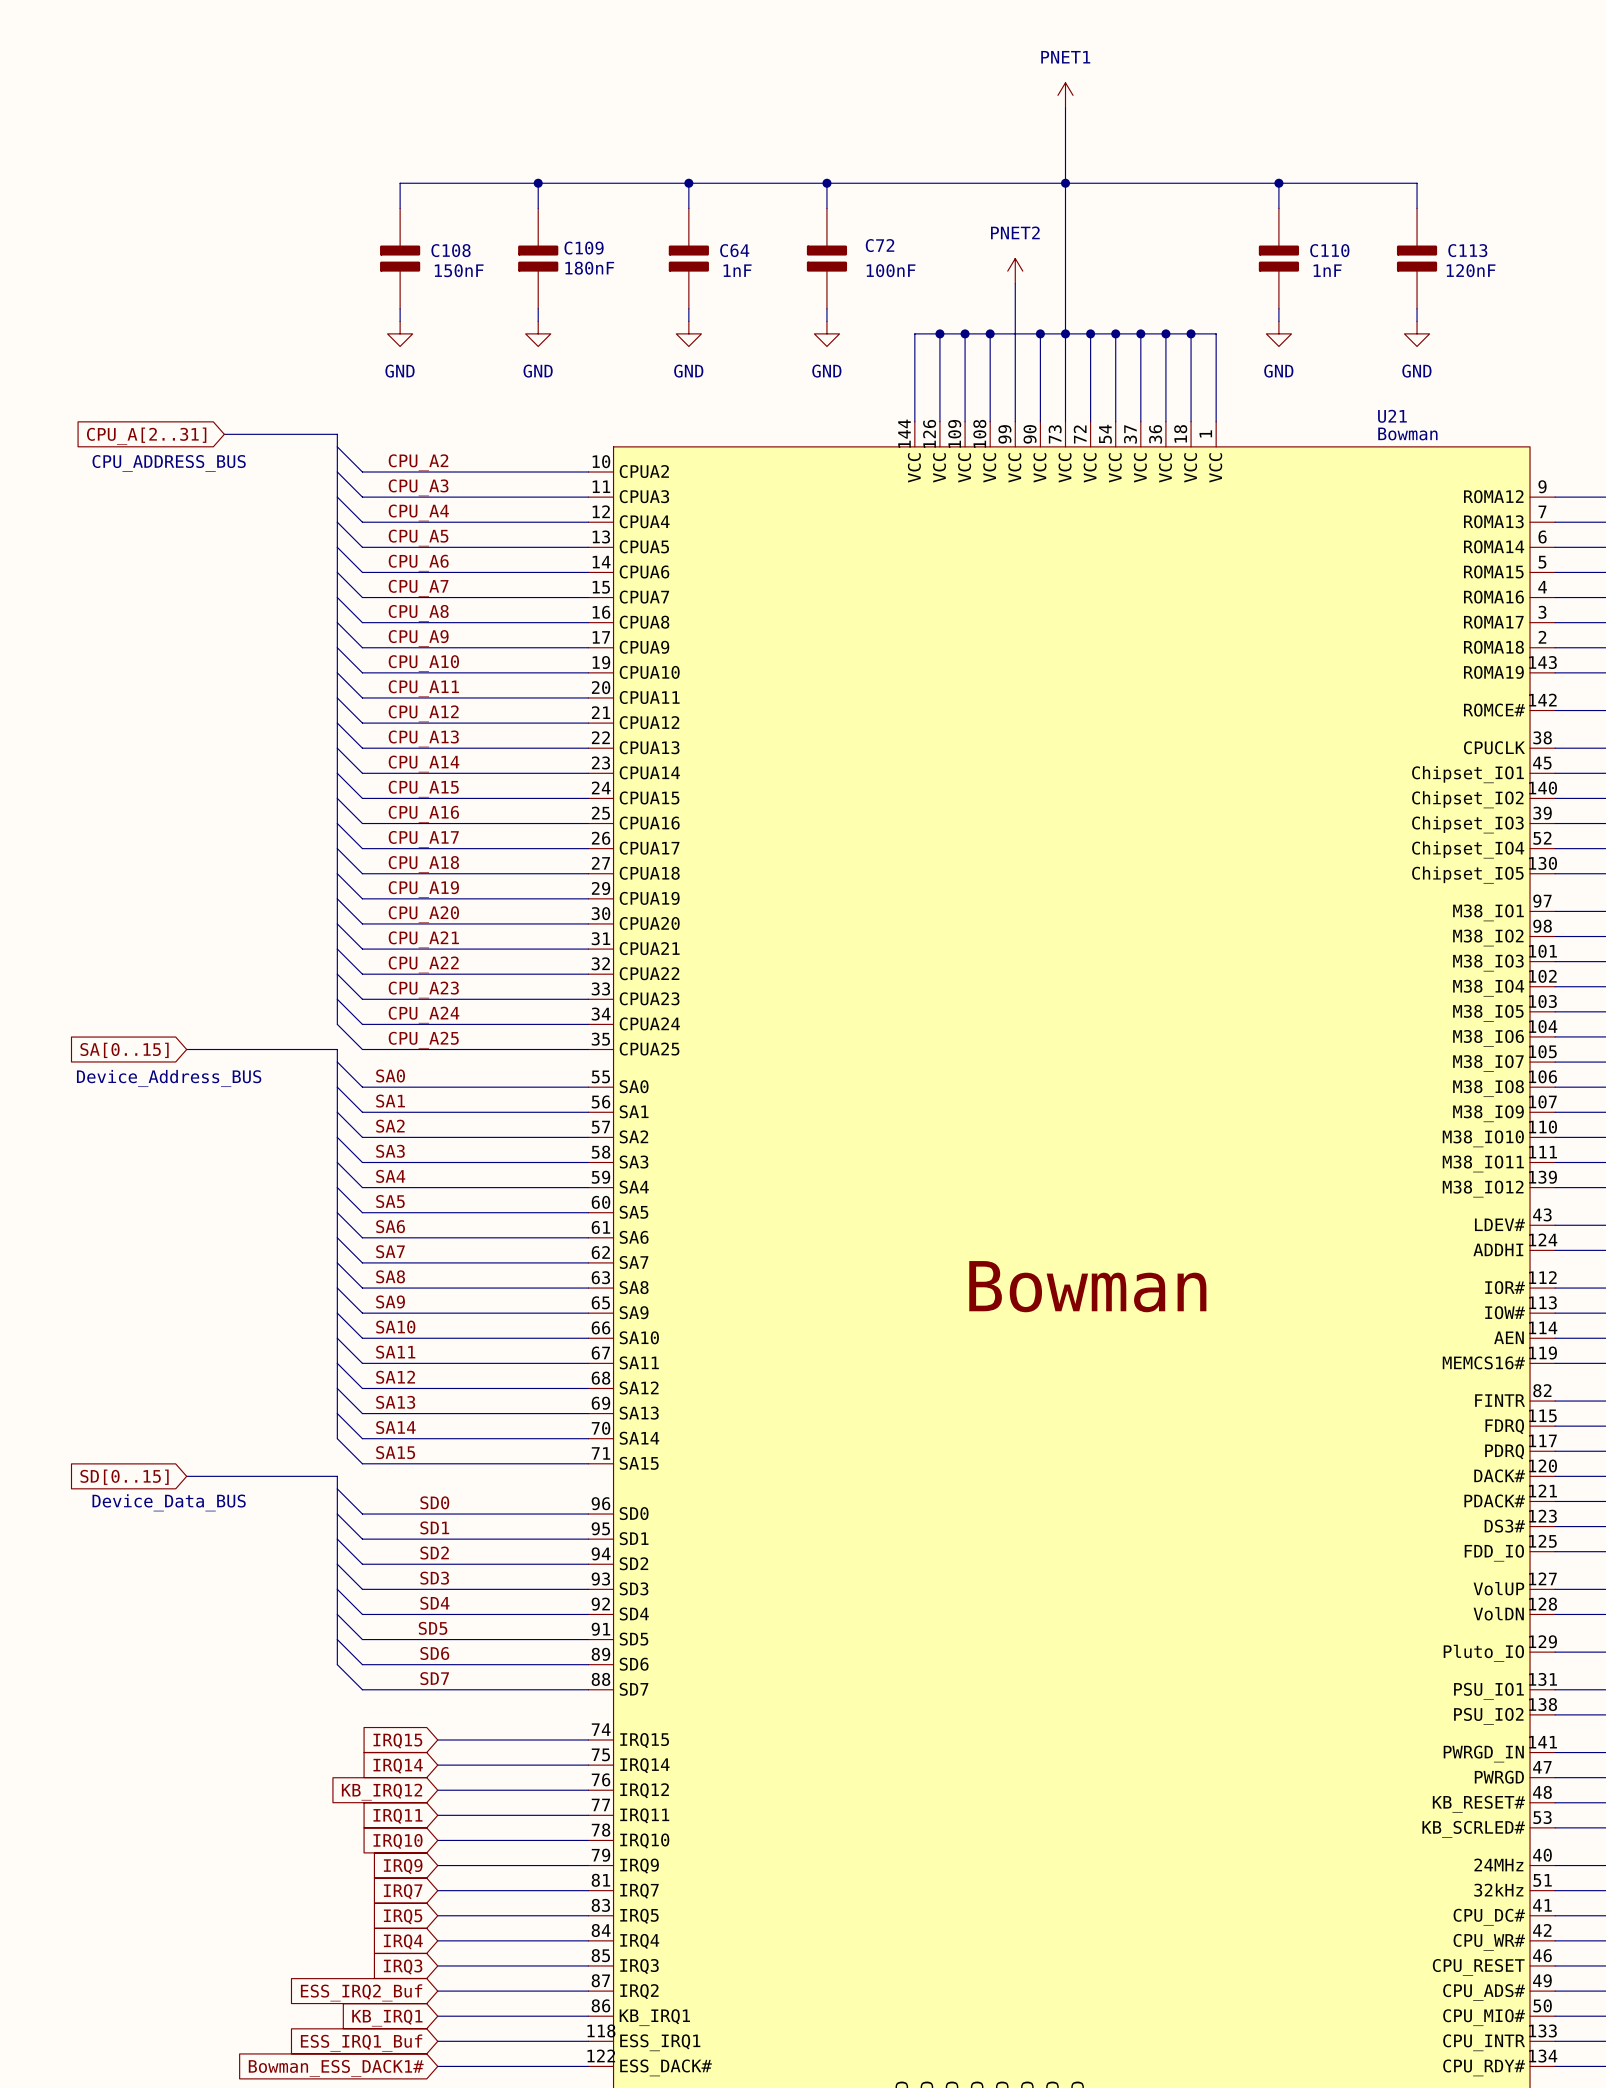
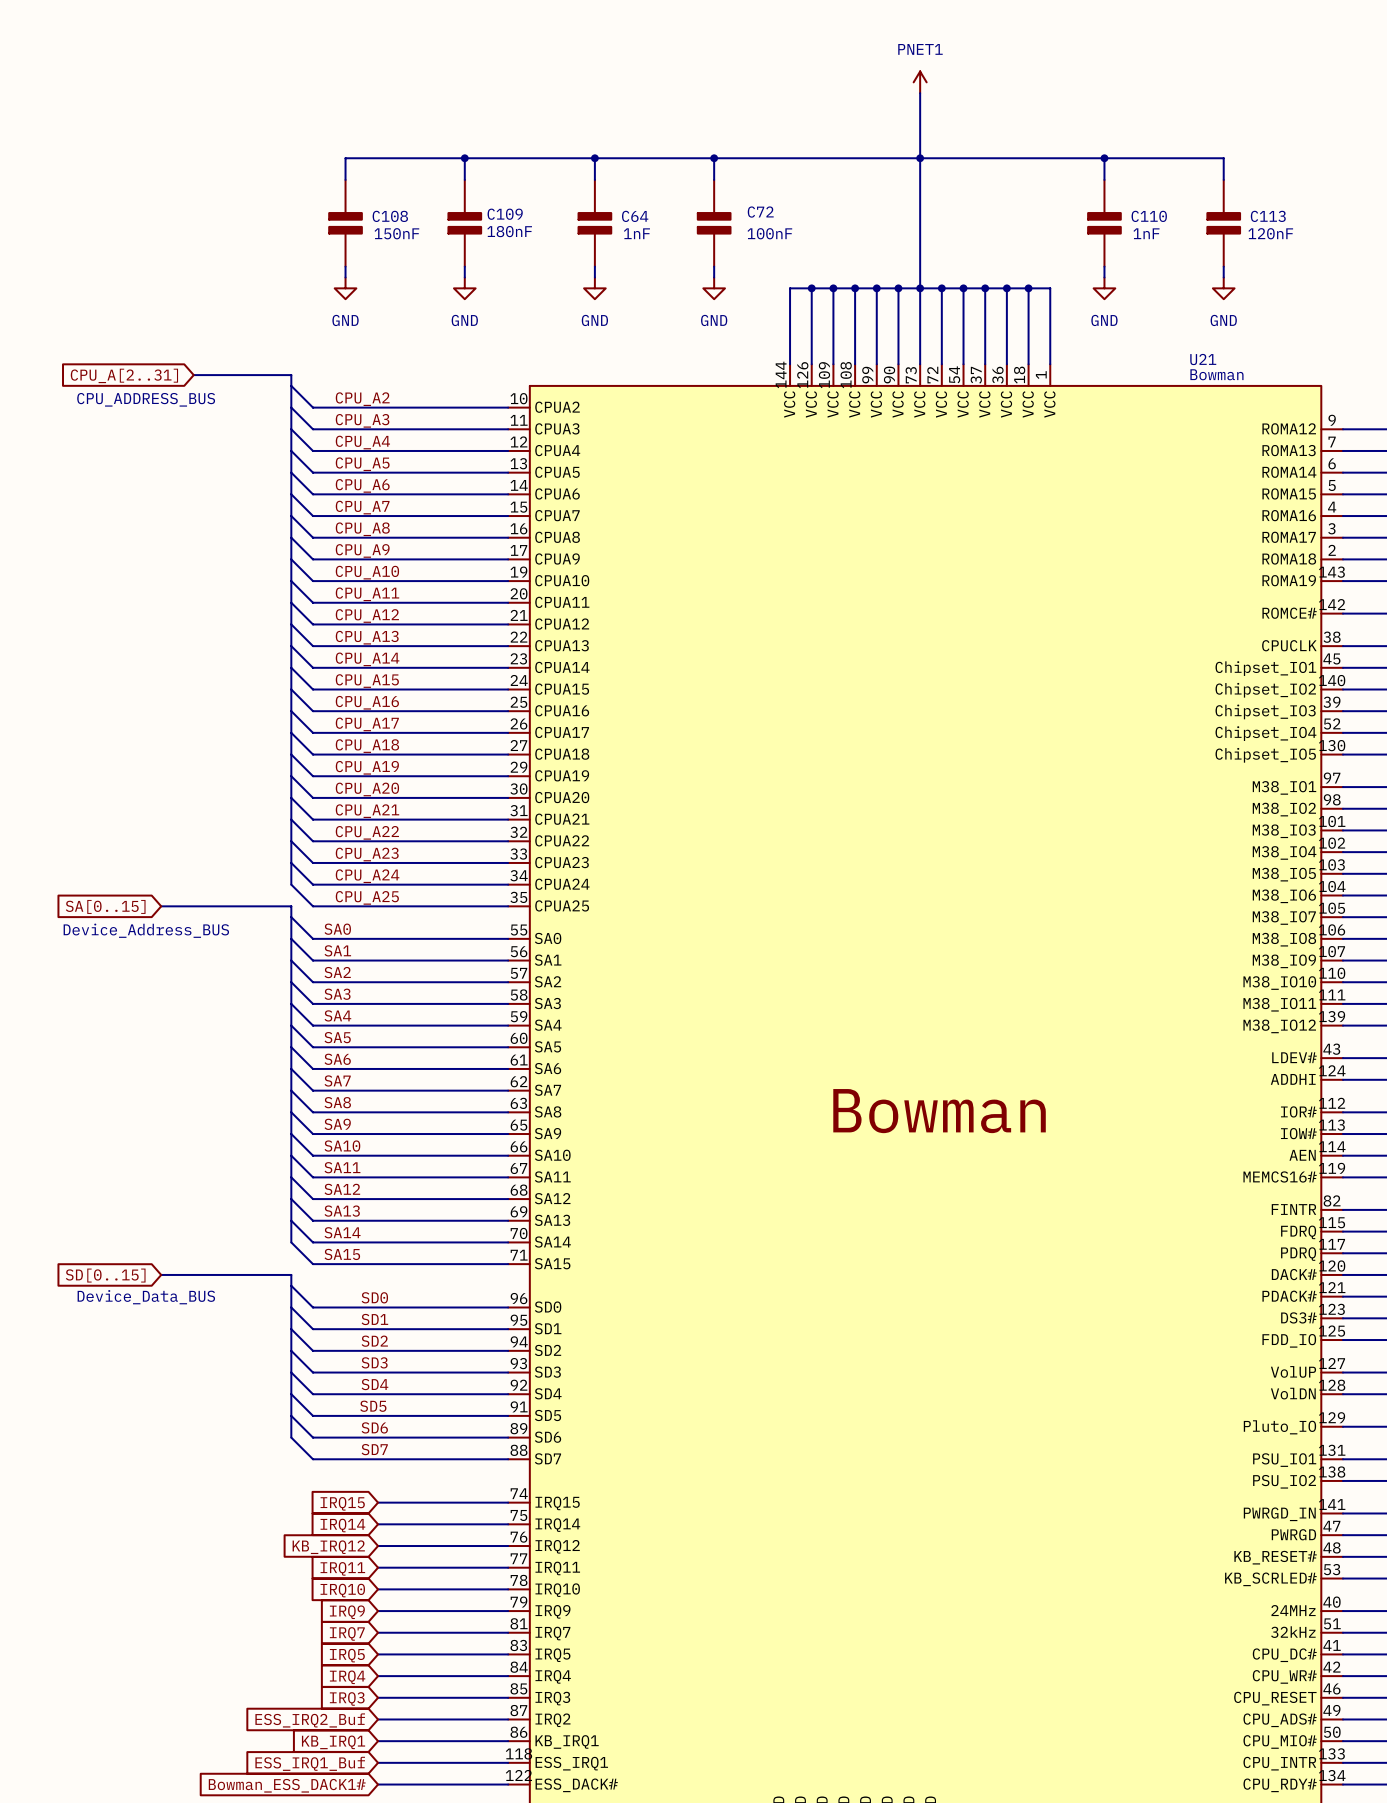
power symbol: PNET2 (1015, 271) -> none
wire: (1015, 283) (1015, 333) -> none
junction: none -> (876, 288)

